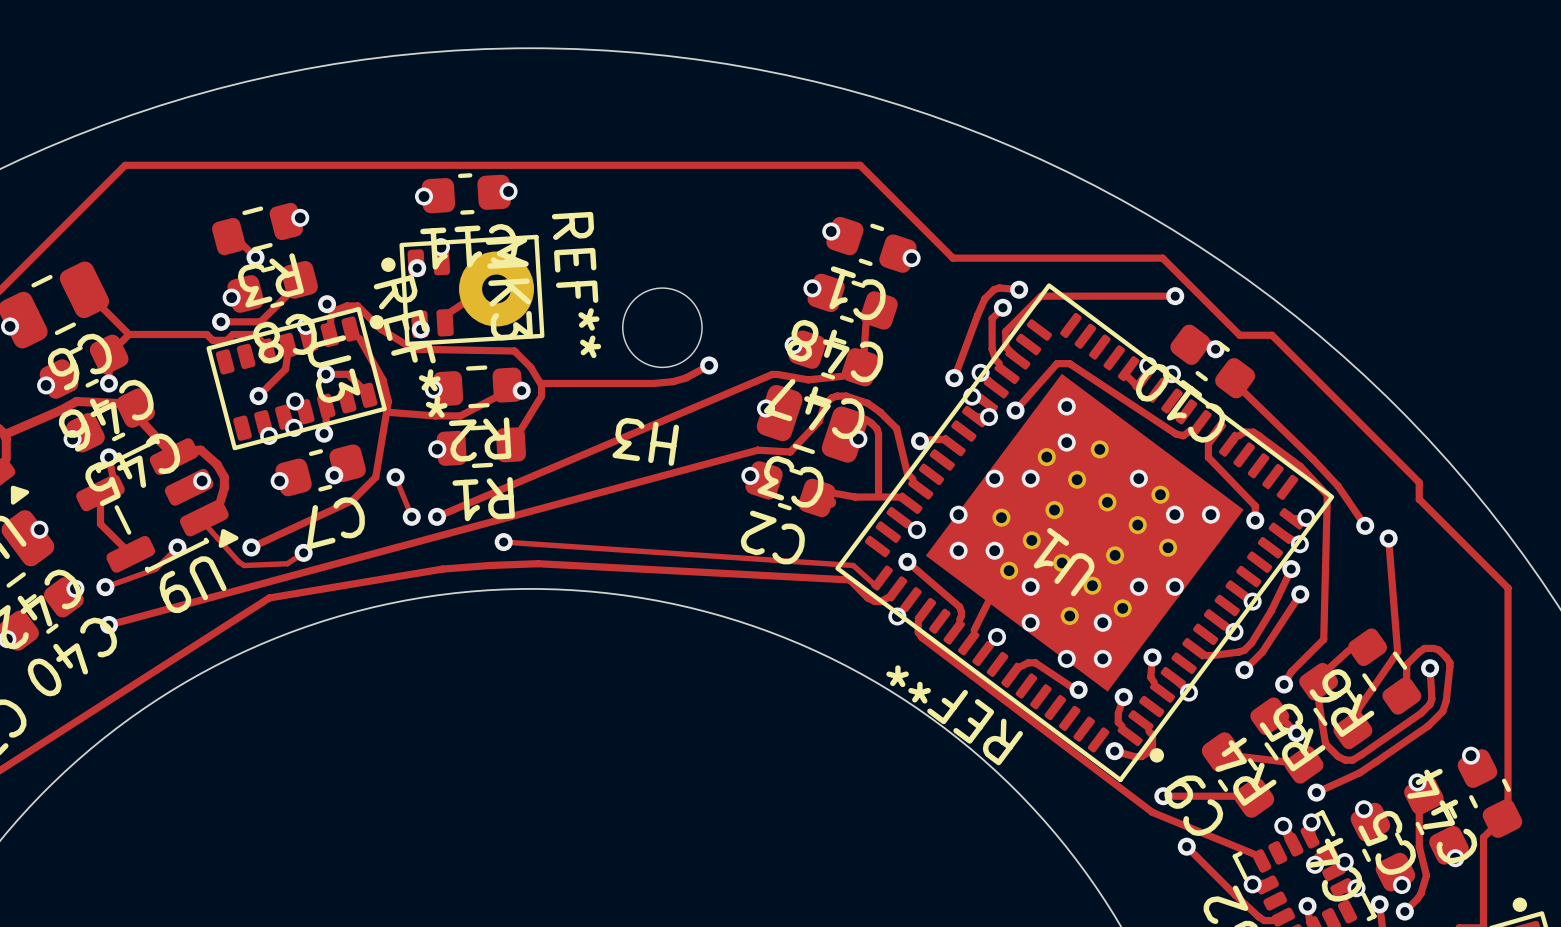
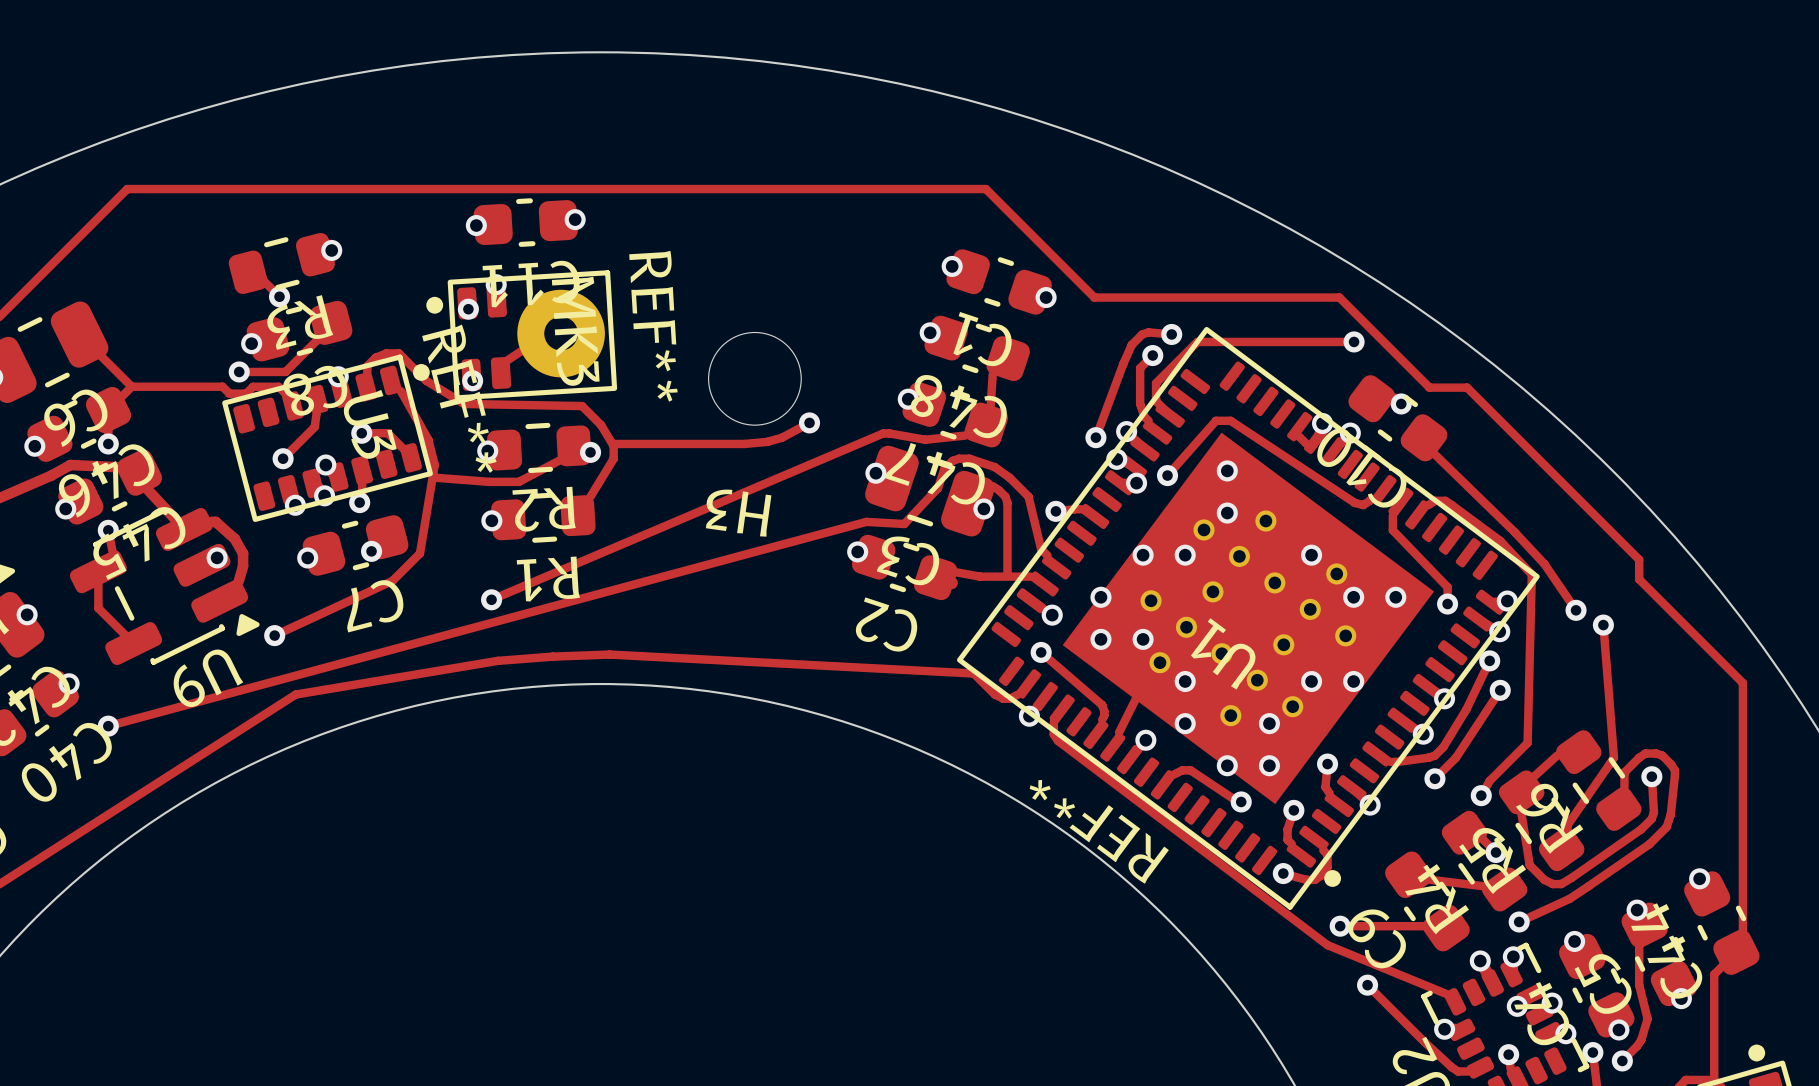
via: (327, 304) -> none
track: (395, 477) (411, 516) -> none
via: (395, 477) -> none
via: (411, 516) -> none
track: (208, 527) (244, 565) (287, 563) (303, 552) -> none
track: (503, 542) (853, 565) (873, 583) -> none
via: (503, 542) -> none
track: (177, 547) (155, 569) (105, 587) -> none
via: (177, 547) -> none
via: (303, 552) -> none
via: (105, 587) -> none

